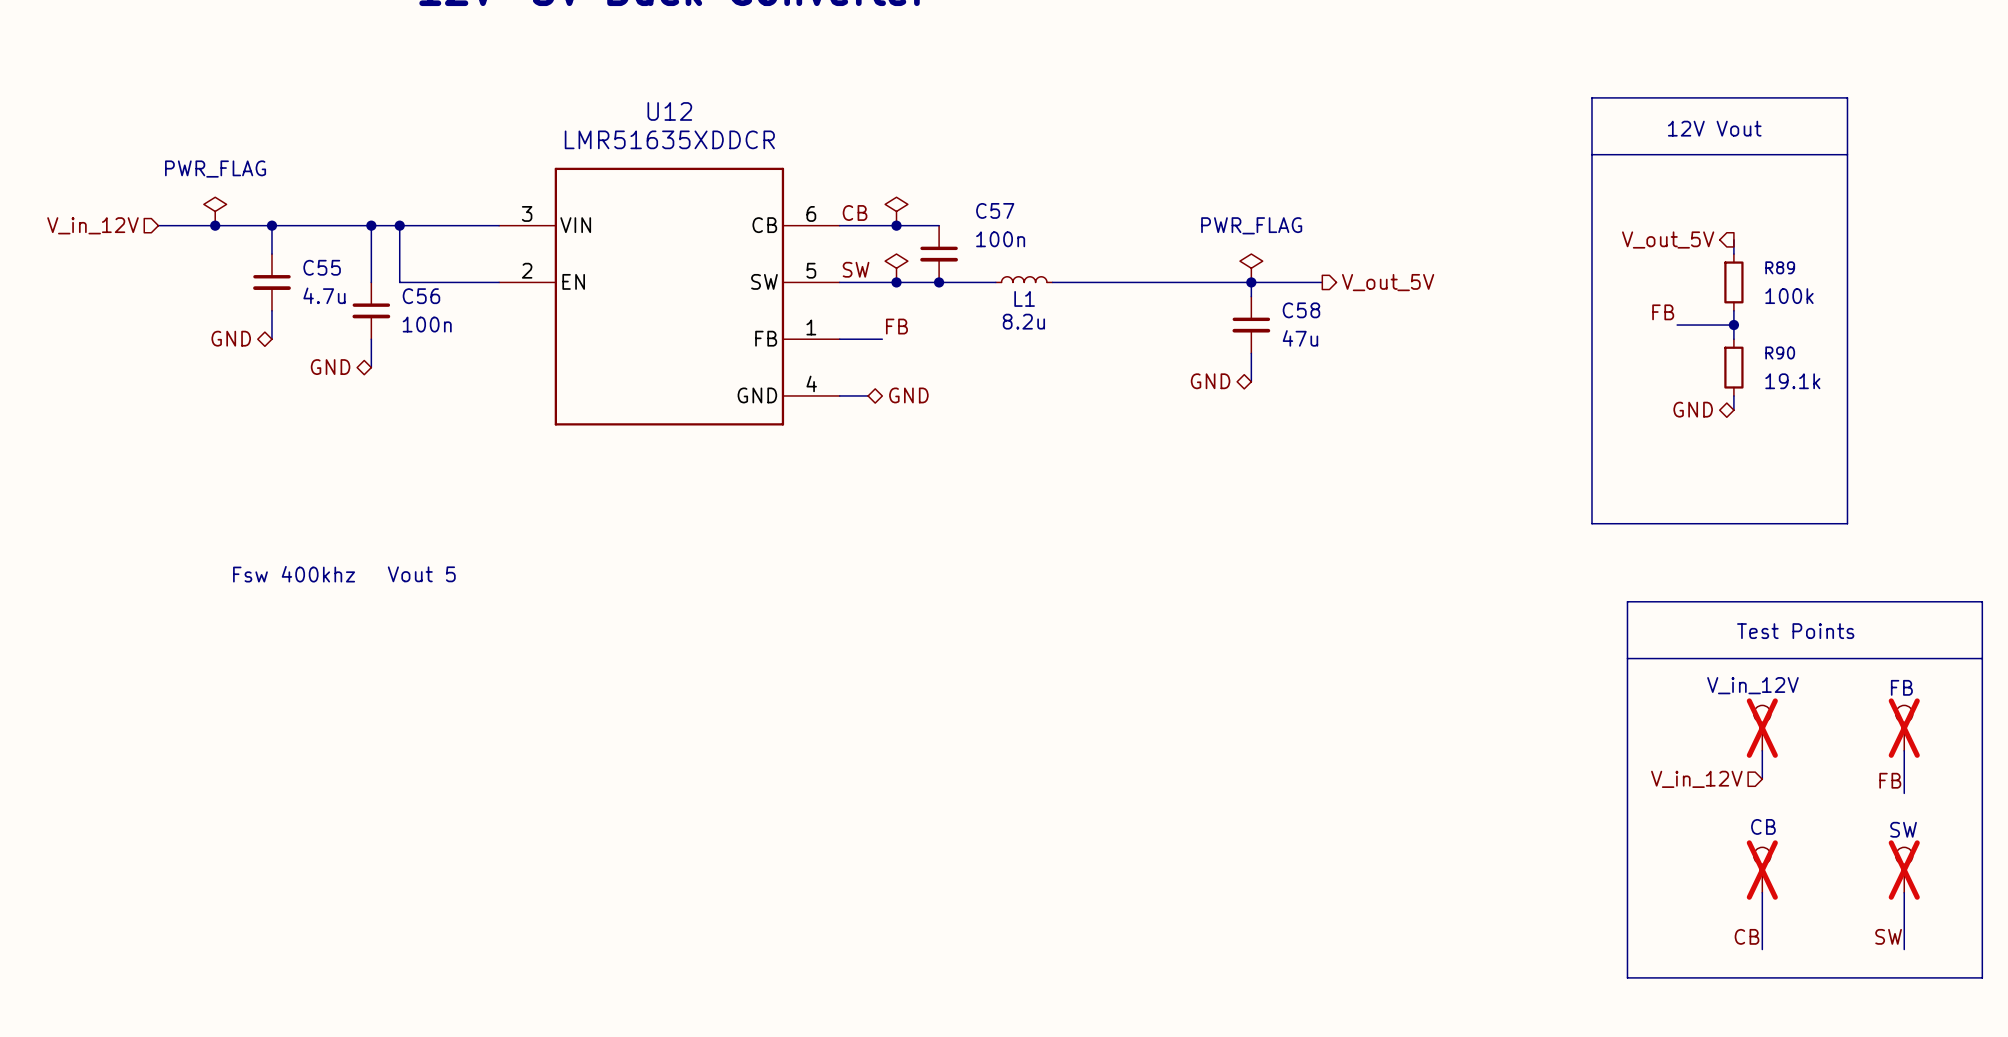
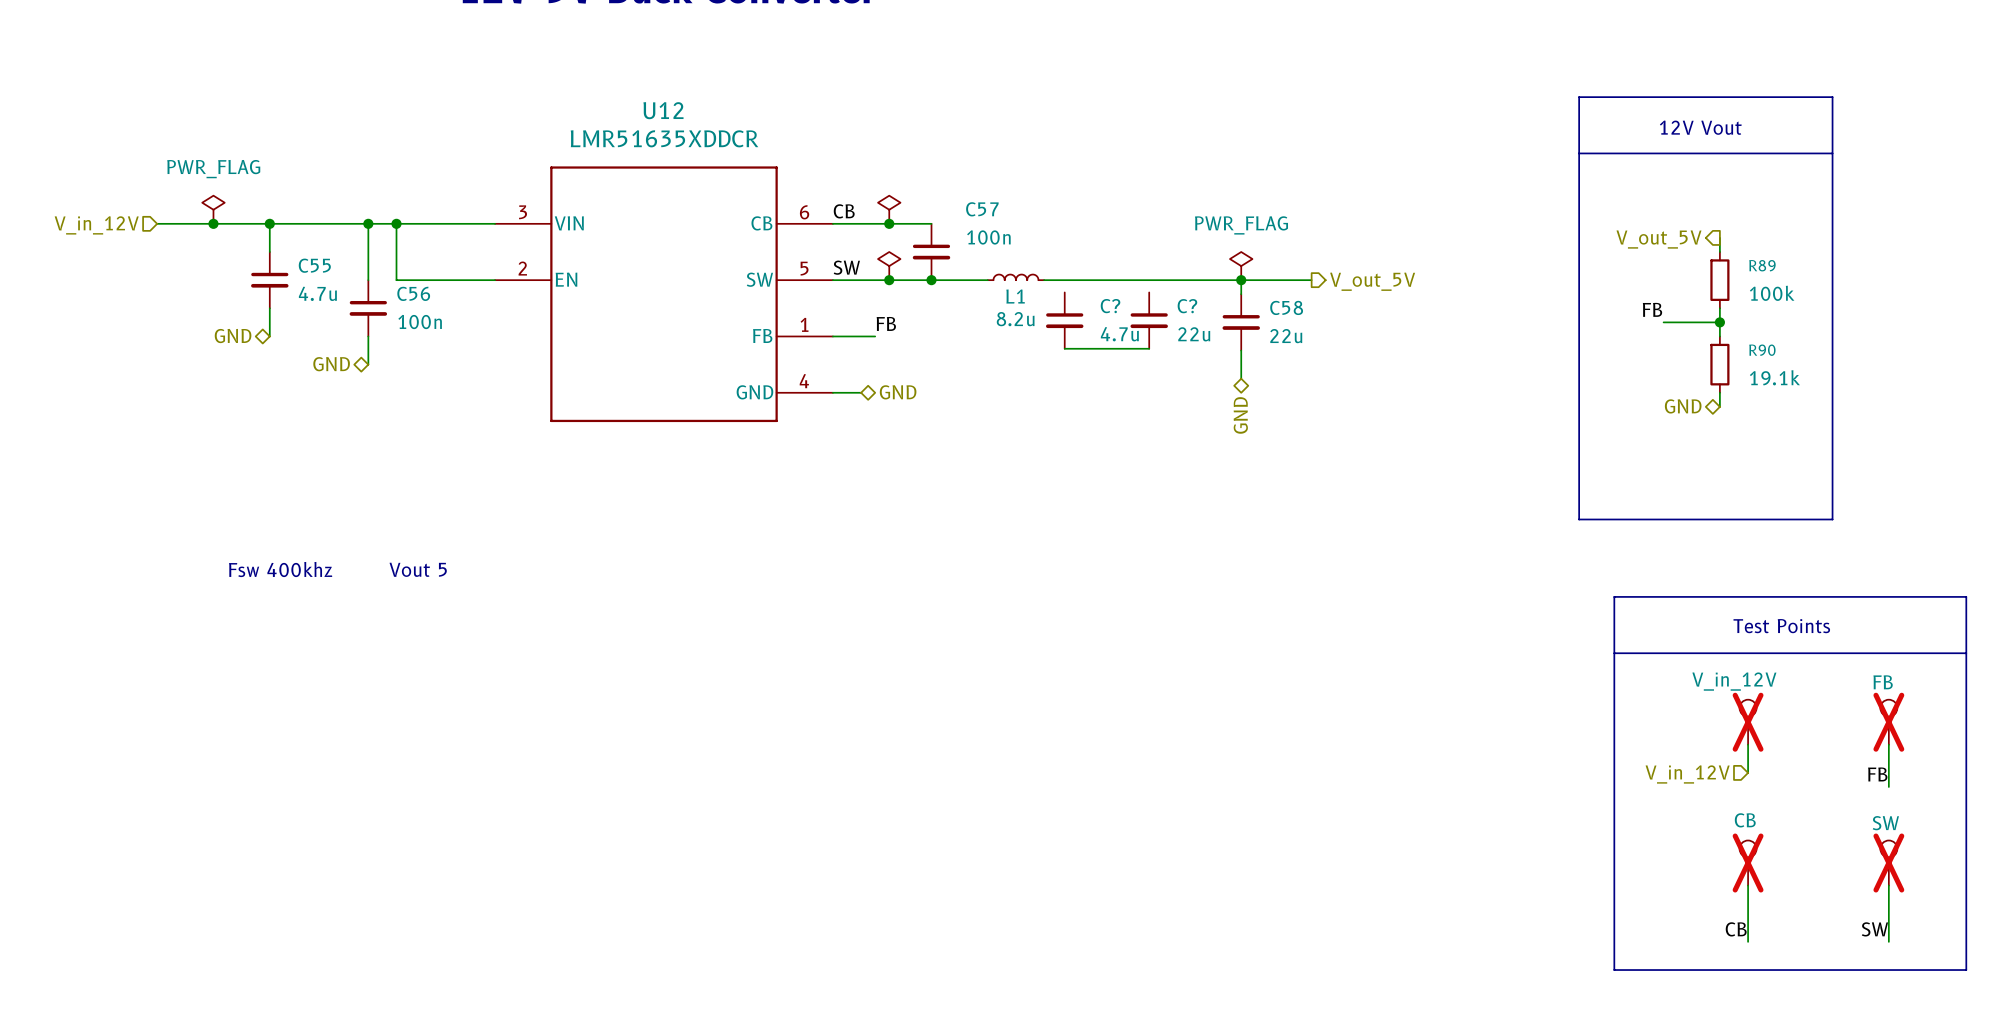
C?: none -> 4.7u (1064, 320)
C?: none -> 22u (1149, 320)
C58 value: 47u (1300, 338) -> 22u (1286, 336)
wire: none -> (1064, 348) (1149, 348)
hierarchical label rotation: 0° (1210, 381) -> 90° counterclockwise (1240, 415)
hierarchical label position: GND (1210, 381) -> GND (1240, 415)

